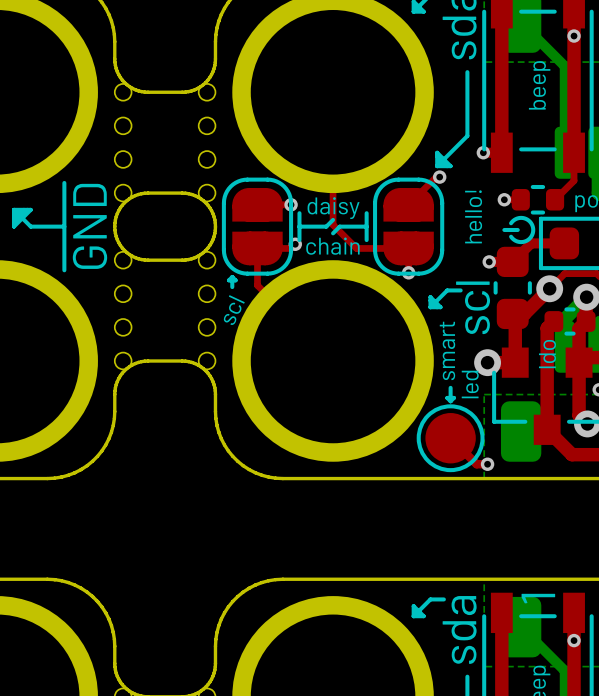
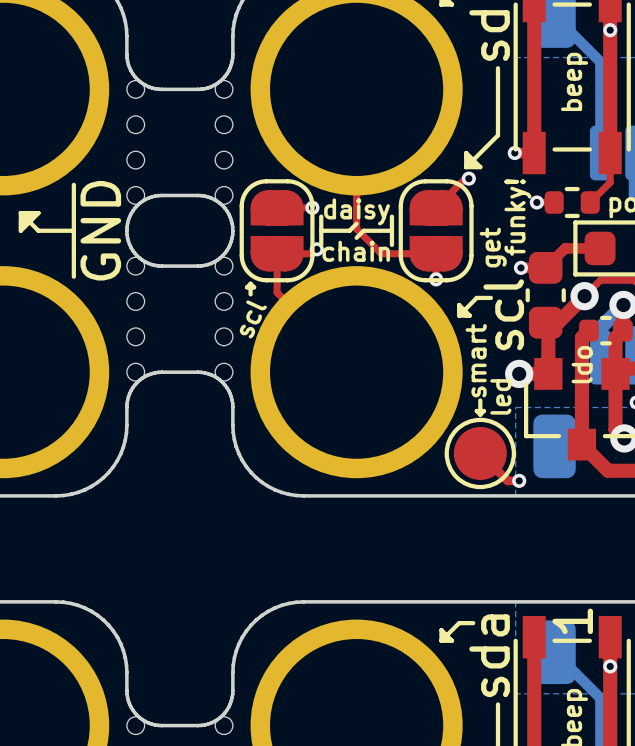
text: hello! (473, 216) -> funky! (517, 217)
line: (511, 223) (517, 218) (524, 218) (530, 222) (533, 229) (530, 237) (524, 241) (517, 241) (511, 236) -> none
line: (504, 229) (517, 229) -> none
text: none -> get (493, 247)

